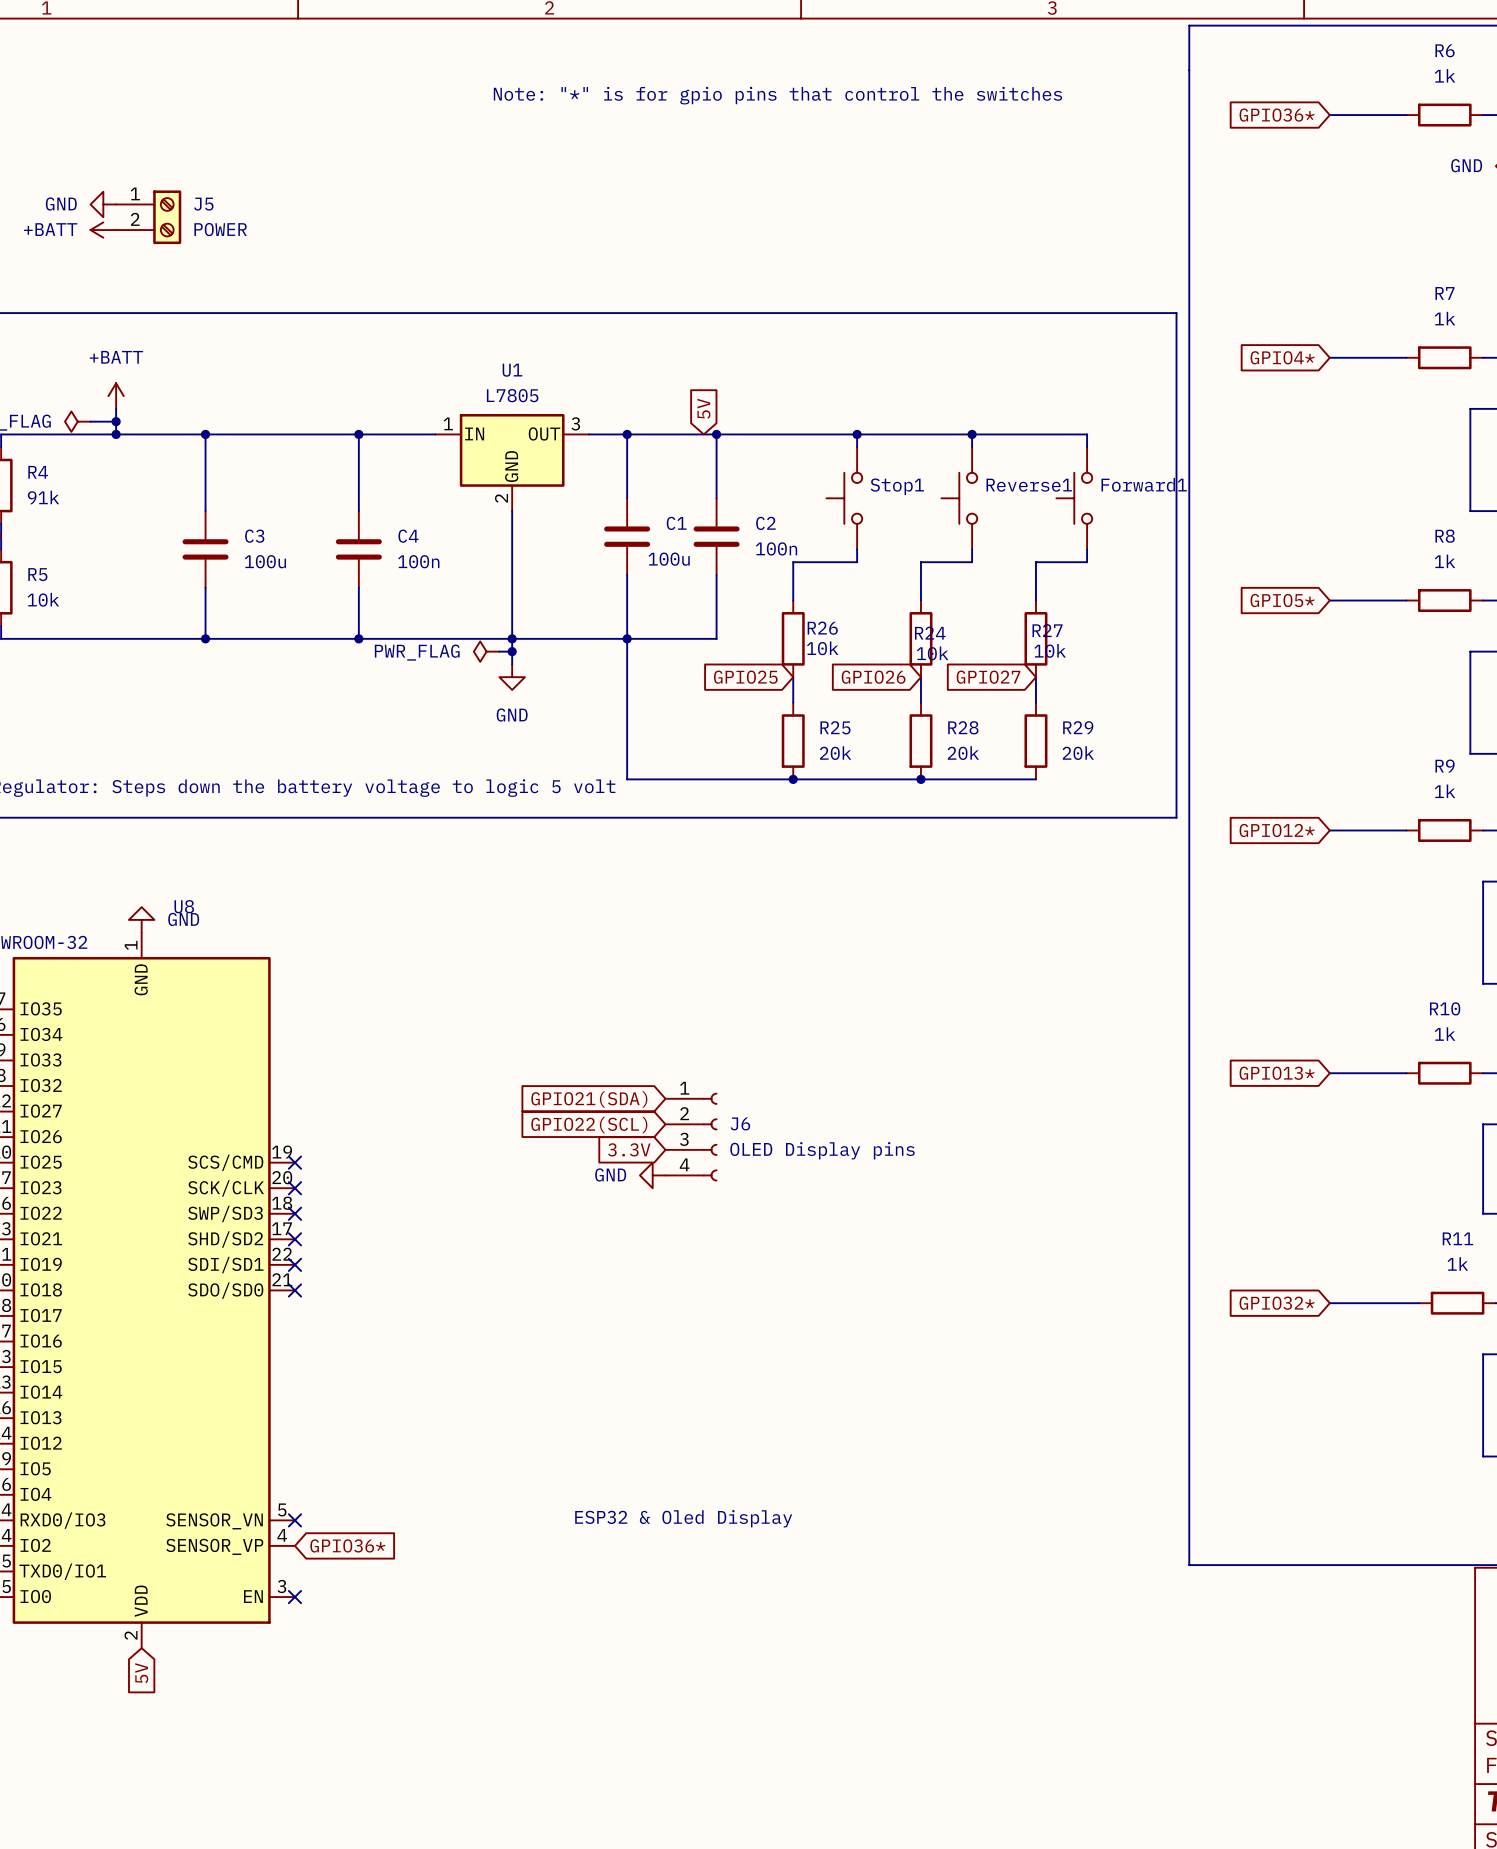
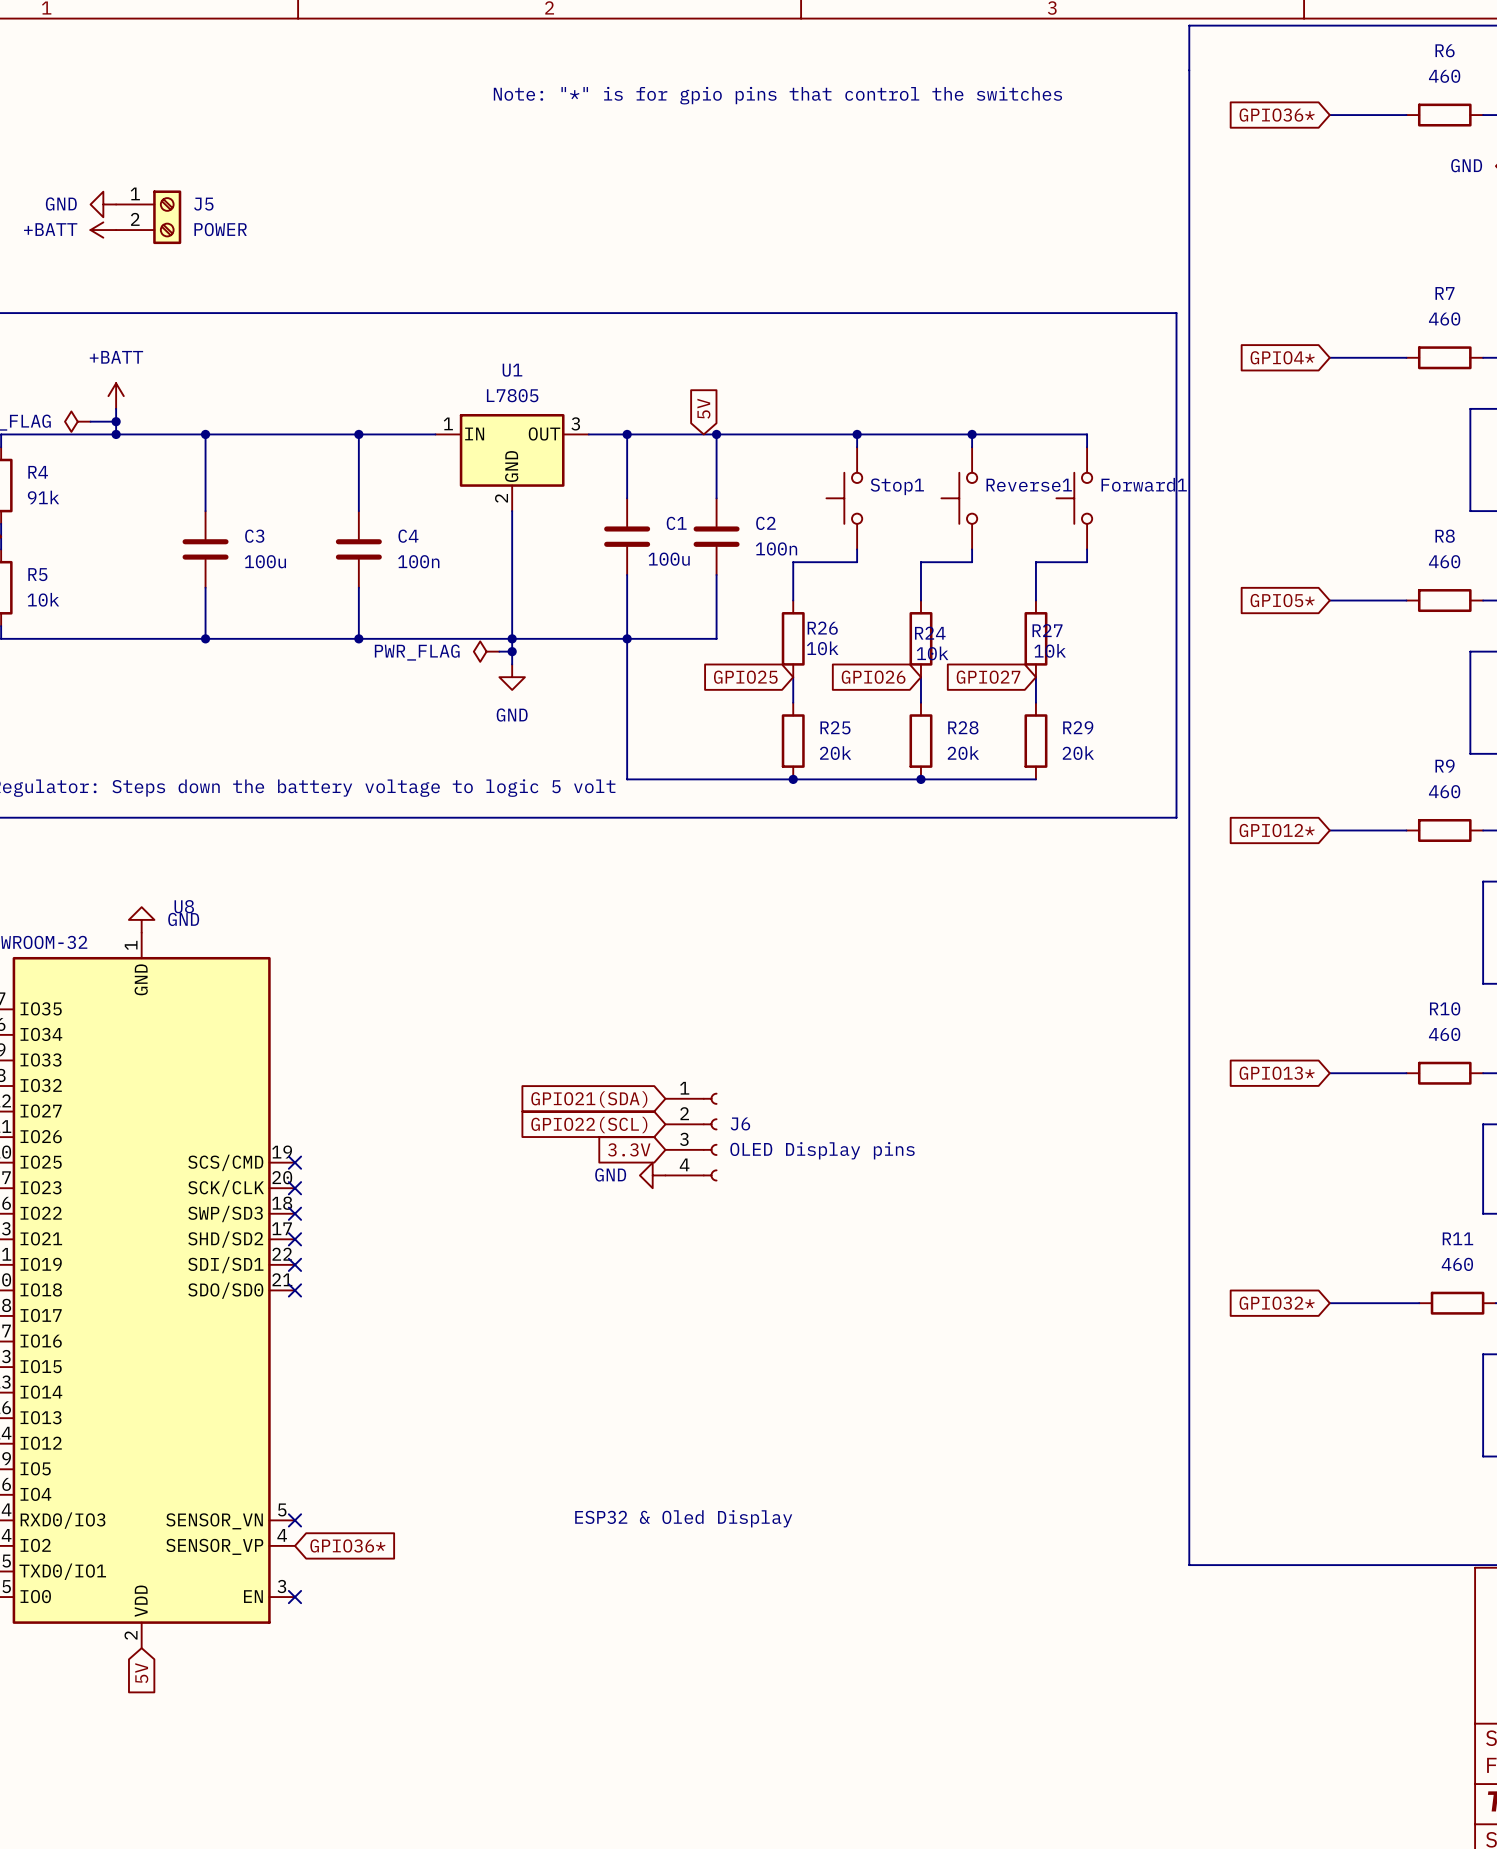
R6 value: 1k (1445, 75) -> 460 (1444, 76)
R7 value: 1k (1445, 318) -> 460 (1444, 318)
R8 value: 1k (1445, 561) -> 460 (1444, 561)
R9 value: 1k (1445, 791) -> 460 (1444, 791)
R10 value: 1k (1445, 1034) -> 460 (1444, 1034)
R11 value: 1k (1457, 1264) -> 460 (1457, 1264)

